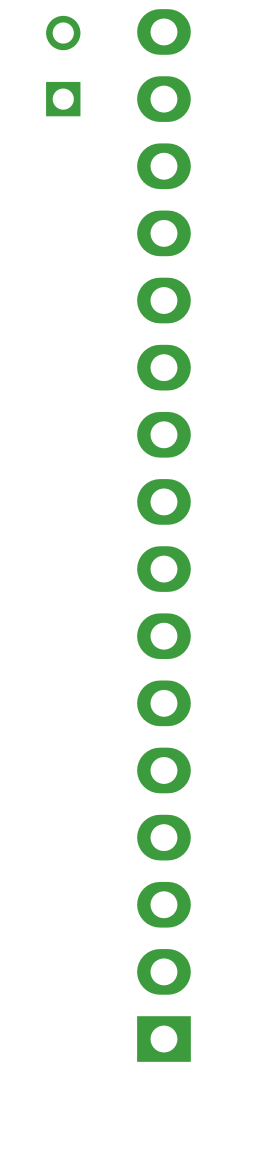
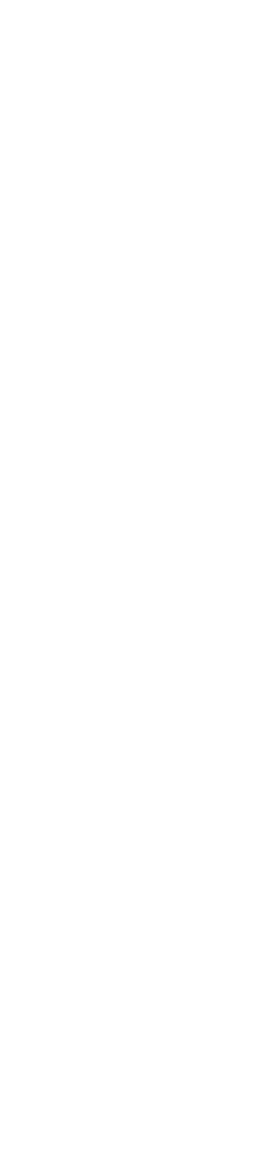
part: (63, 66) -> none
part: (163, 535) -> none

